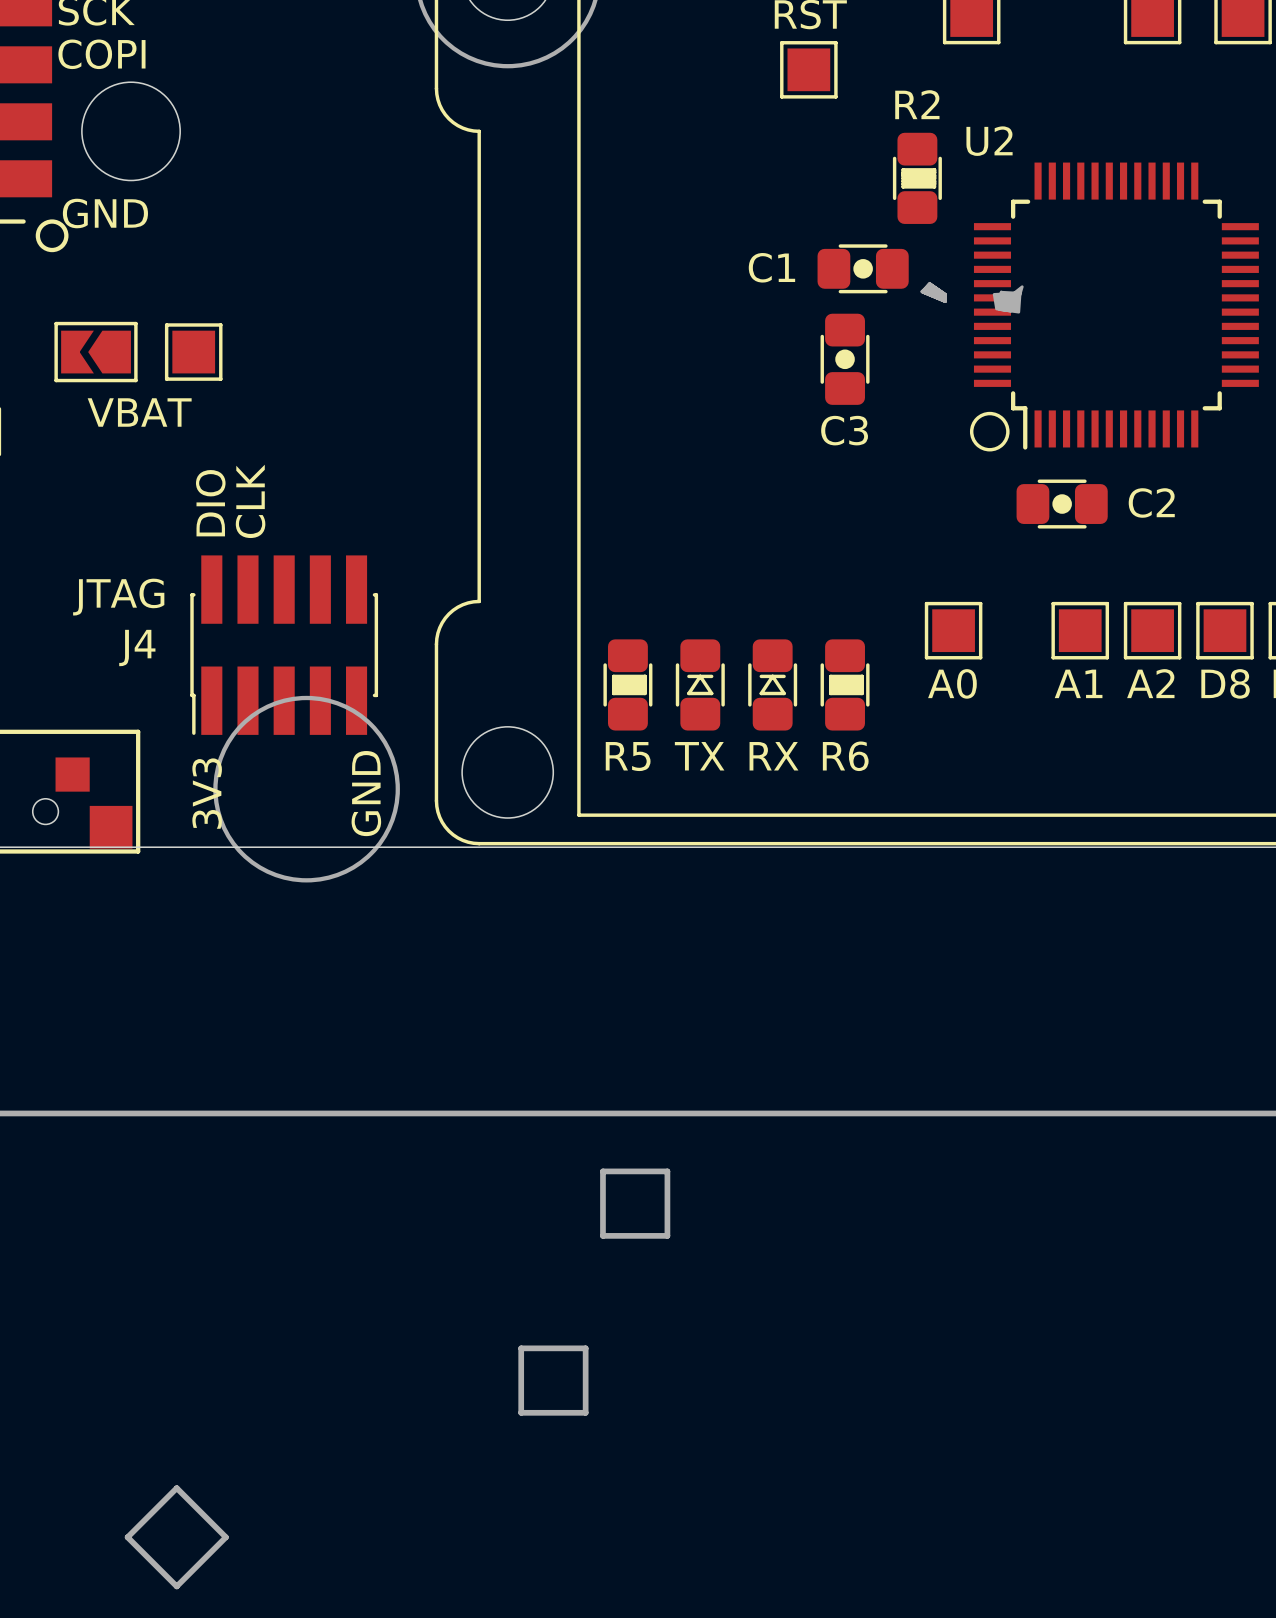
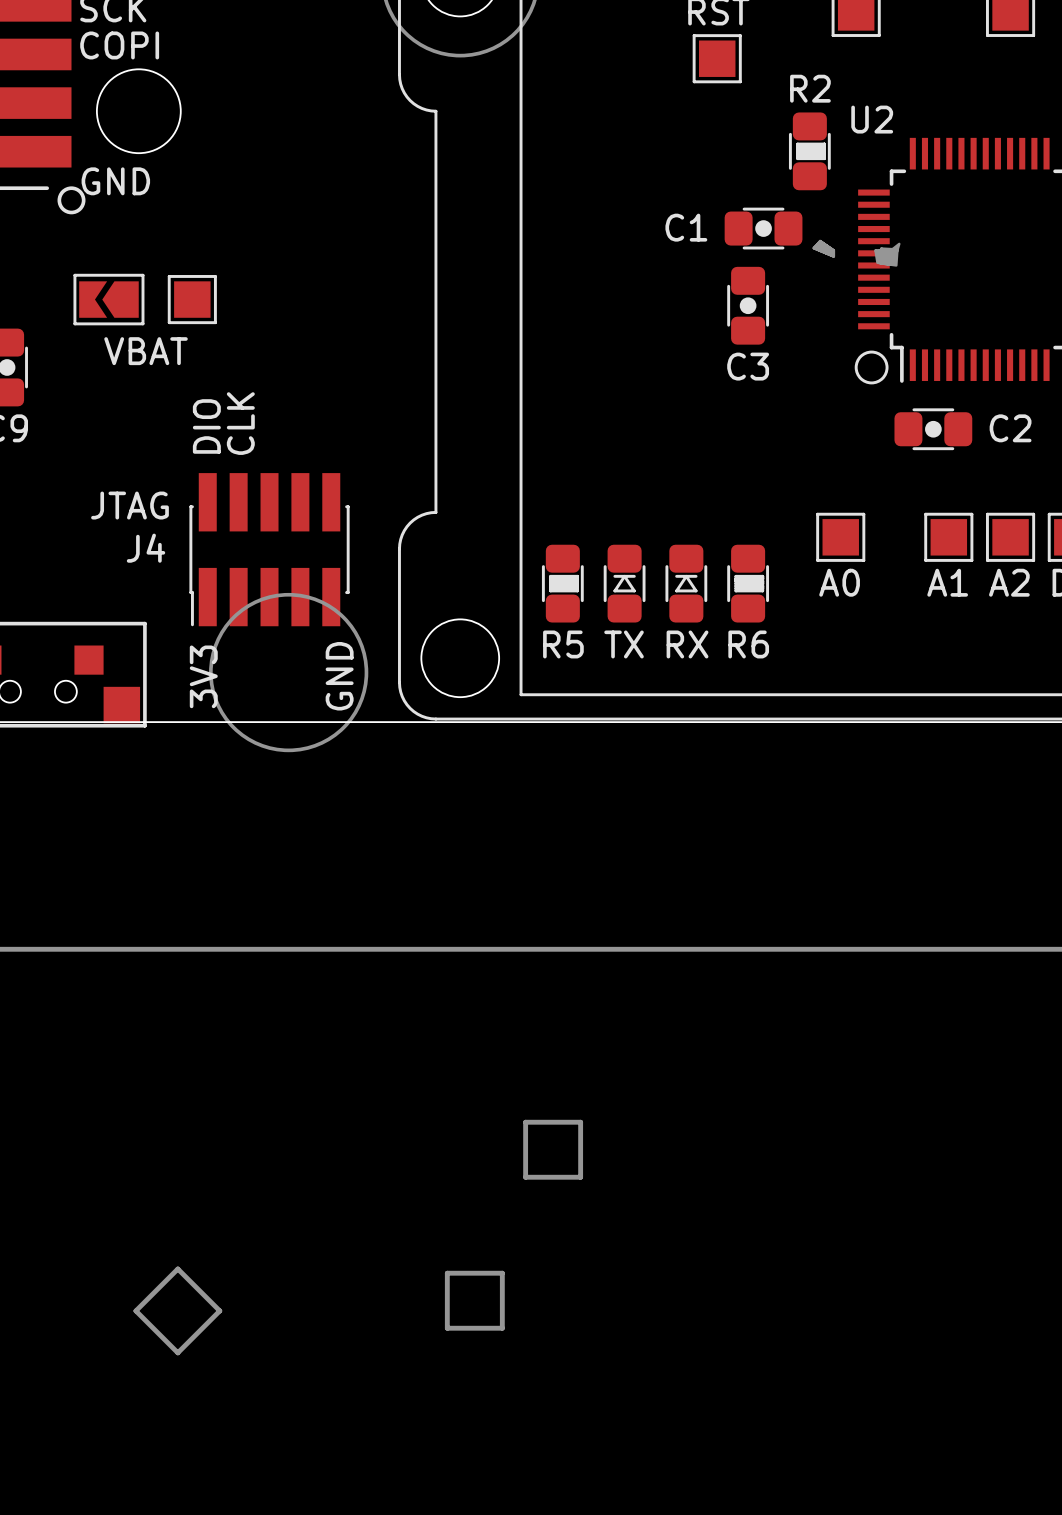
line: (602, 1171) (667, 1171) (667, 1235) (602, 1235) (602, 1171) -> (525, 1122) (580, 1122) (580, 1177) (525, 1177) (525, 1122)
line: (521, 1348) (585, 1348) (585, 1412) (521, 1412) (521, 1348) -> (447, 1273) (502, 1273) (502, 1328) (447, 1328) (447, 1273)

